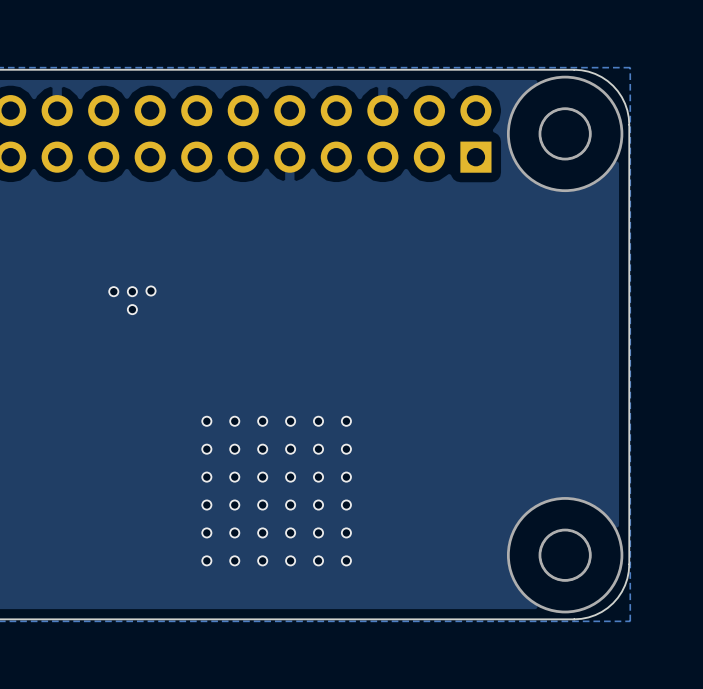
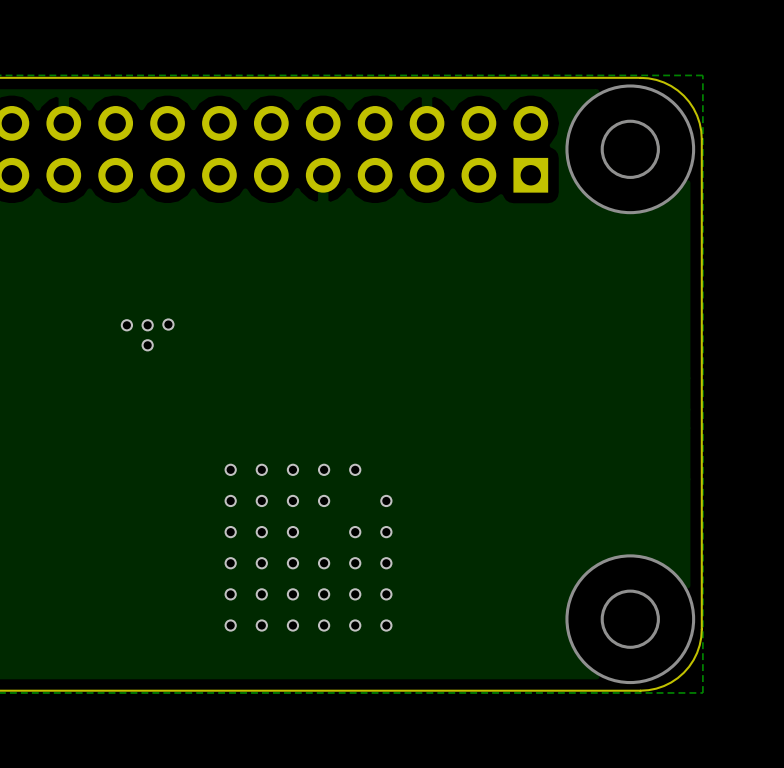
via: (346, 421) -> none
via: (318, 449) -> none
via: (290, 477) -> none

